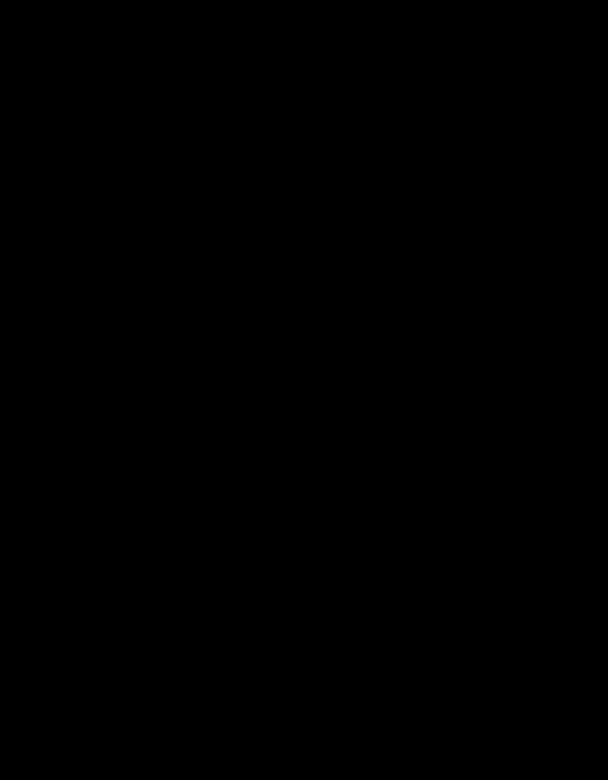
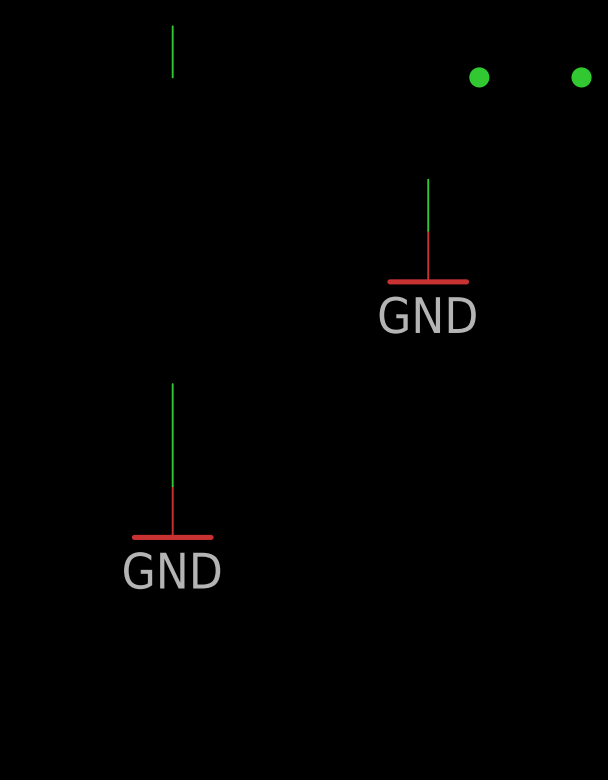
wire: none -> (172, 26) (172, 77)
junction: none -> (479, 77)
junction: none -> (581, 77)
wire: none -> (428, 179) (428, 230)
power symbol: none -> GND (428, 257)
wire: none -> (172, 384) (172, 486)
power symbol: none -> GND (172, 513)

